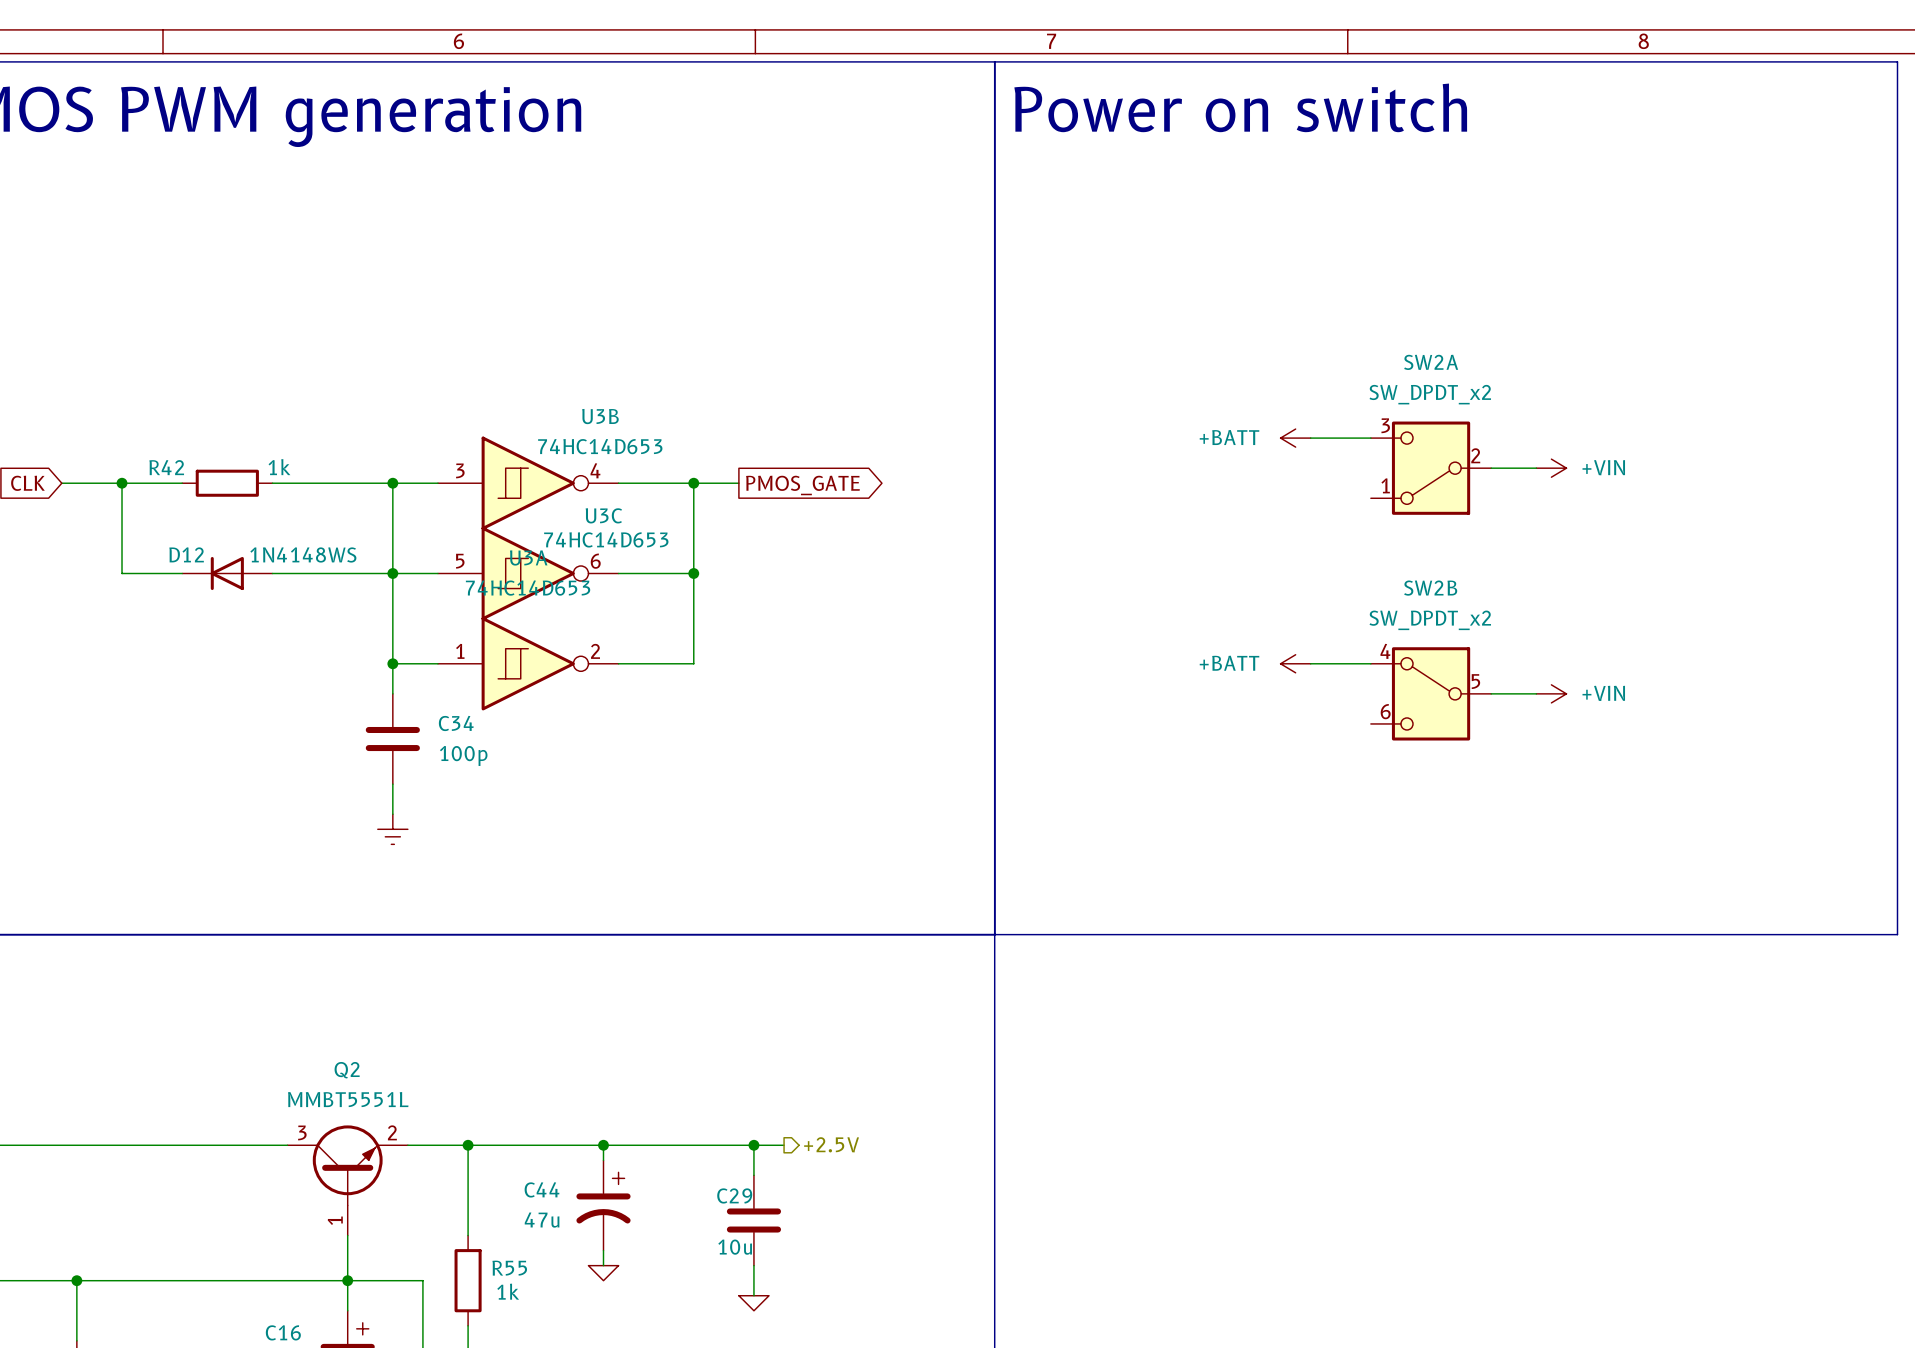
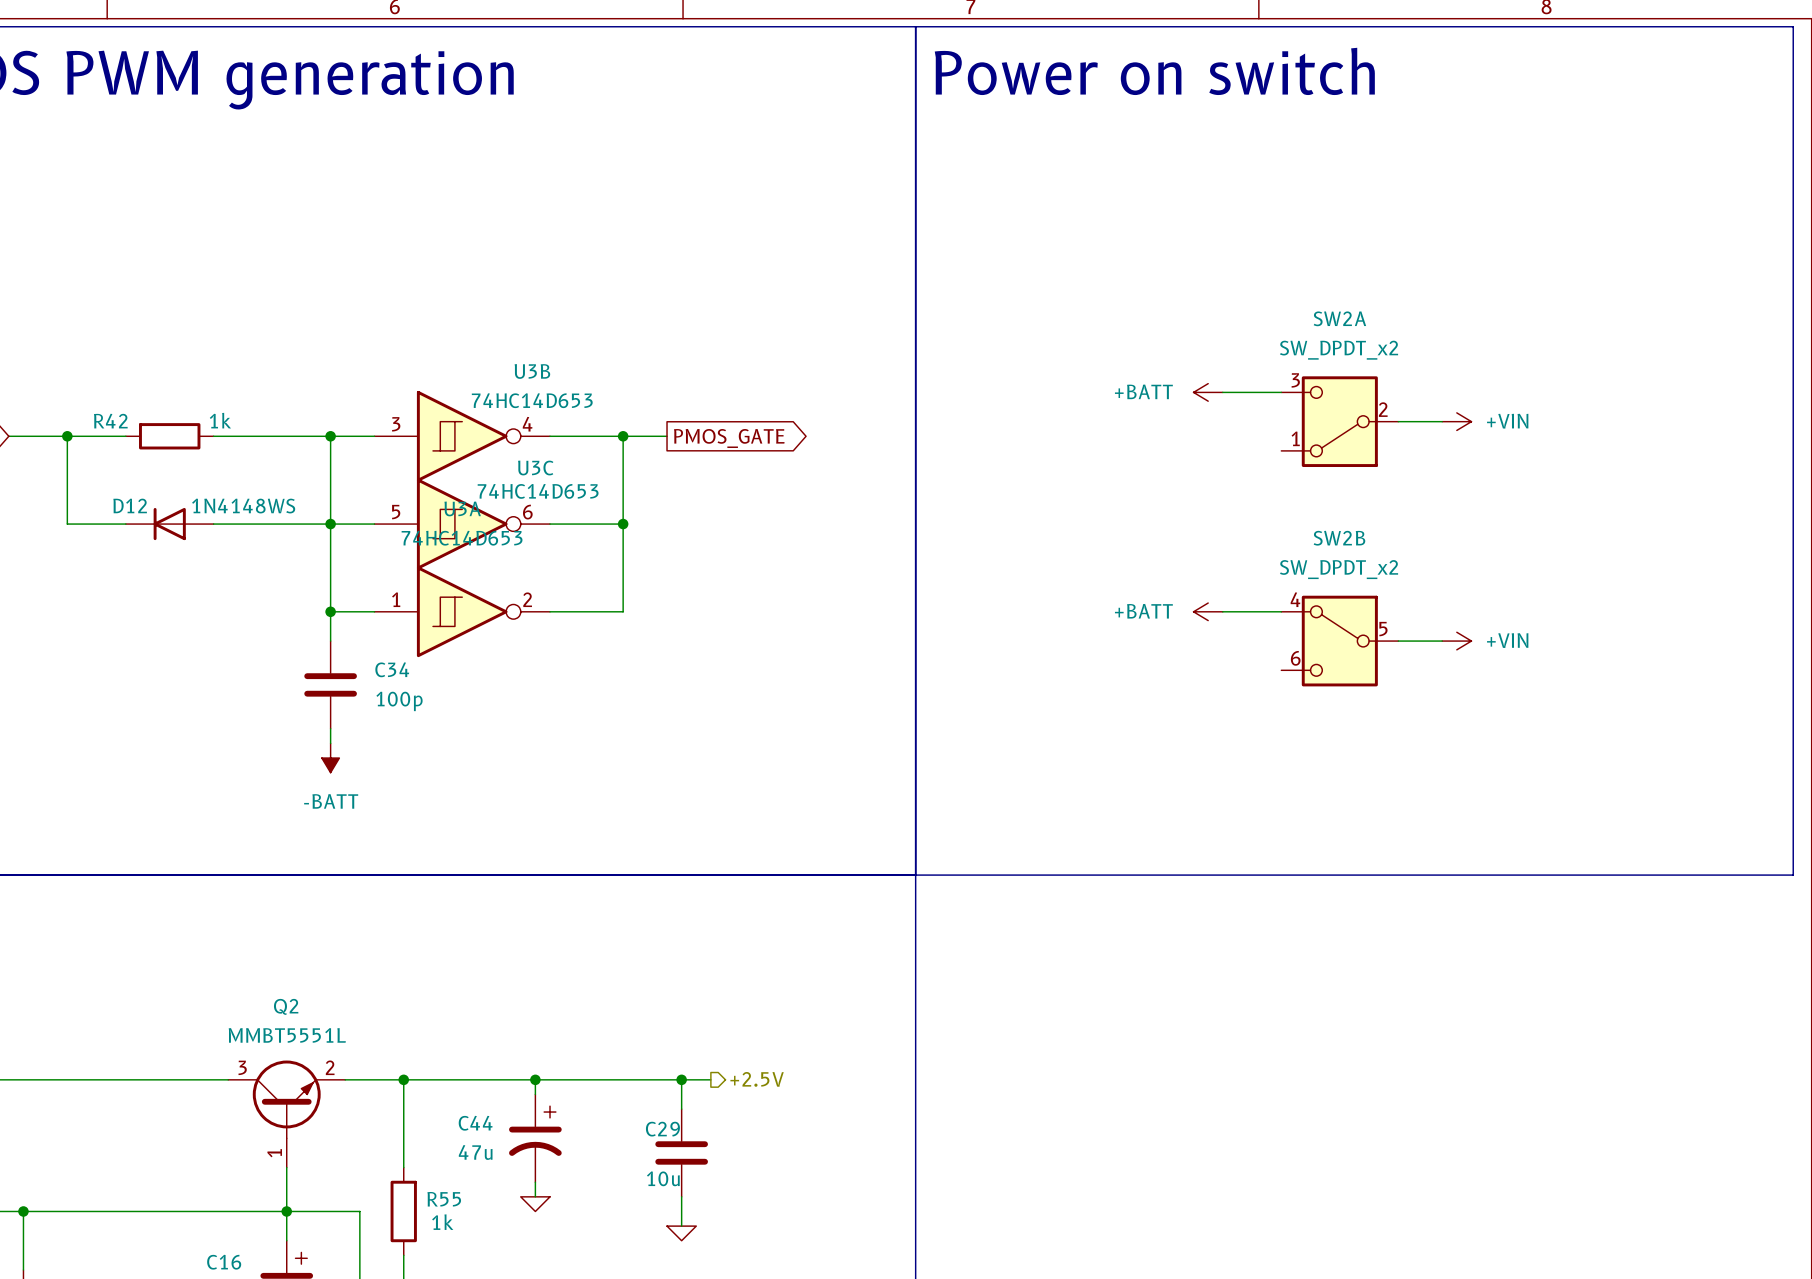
power symbol: none -> -BATT (330, 758)
power symbol: (392, 829) -> none

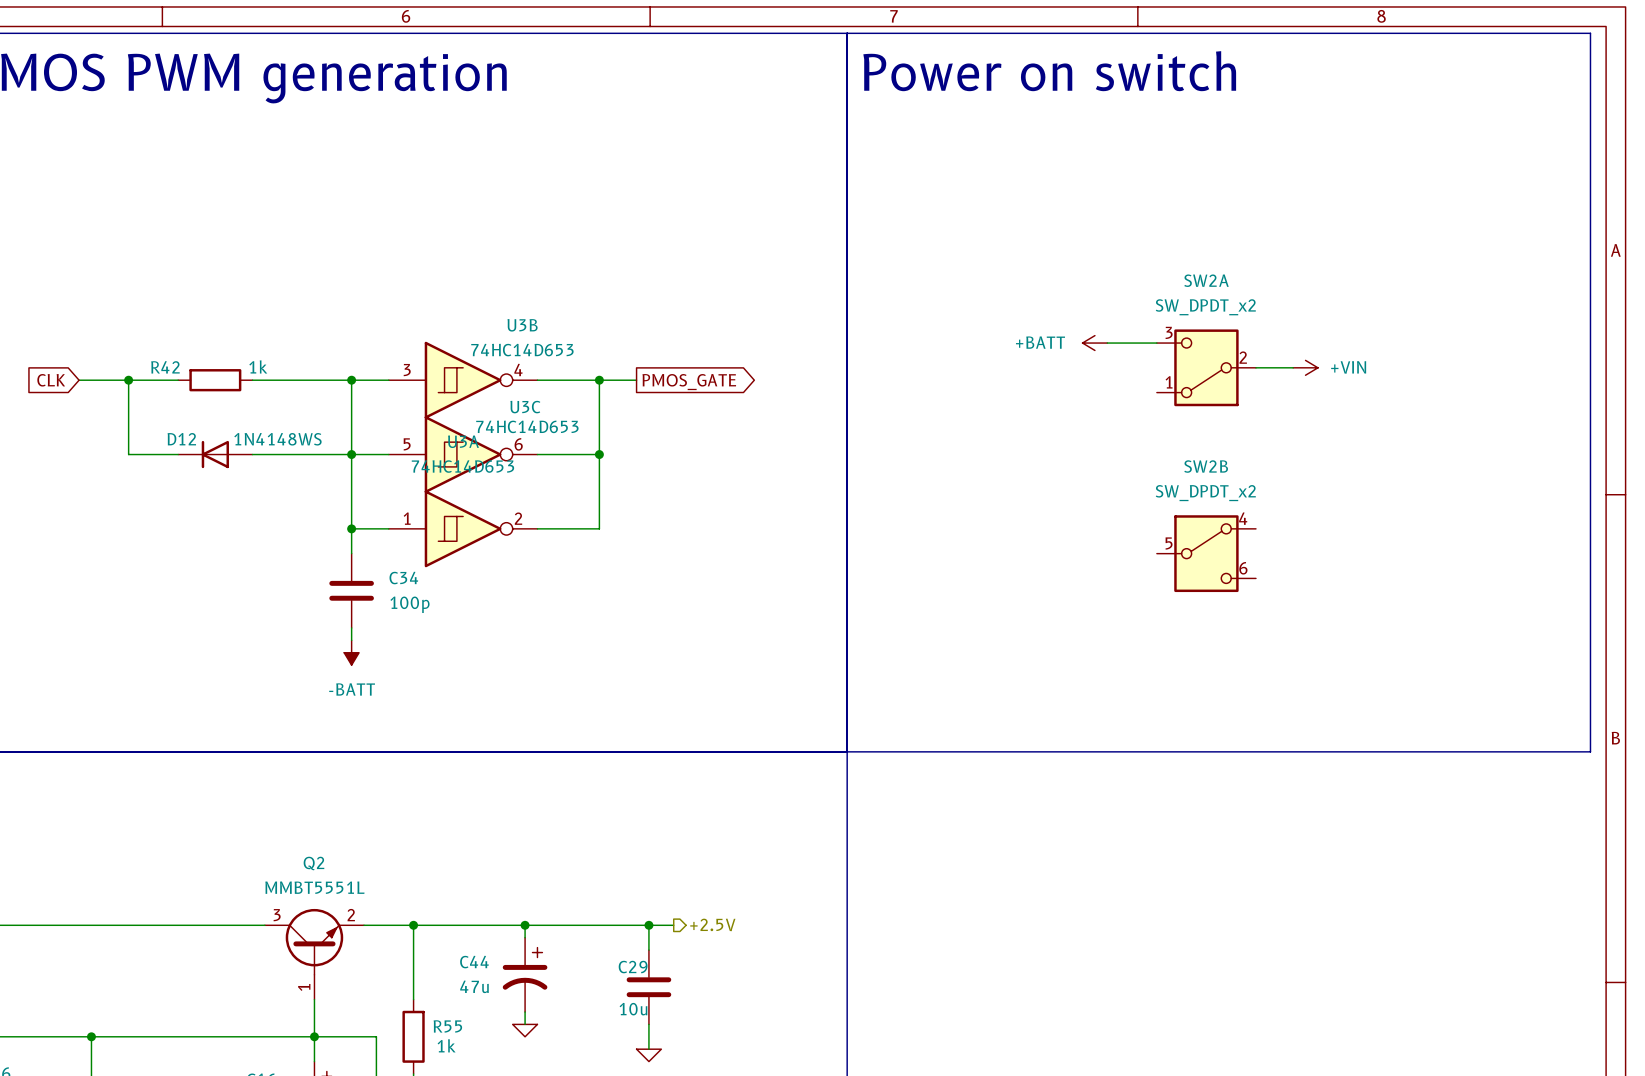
power symbol: +BATT (1208, 611) -> none
wire: (1222, 611) (1281, 611) -> none
SW2B flip: as is (1339, 641) -> left-right (1206, 553)
wire: (1398, 641) (1442, 641) -> none
power symbol: +VIN (1456, 641) -> none

